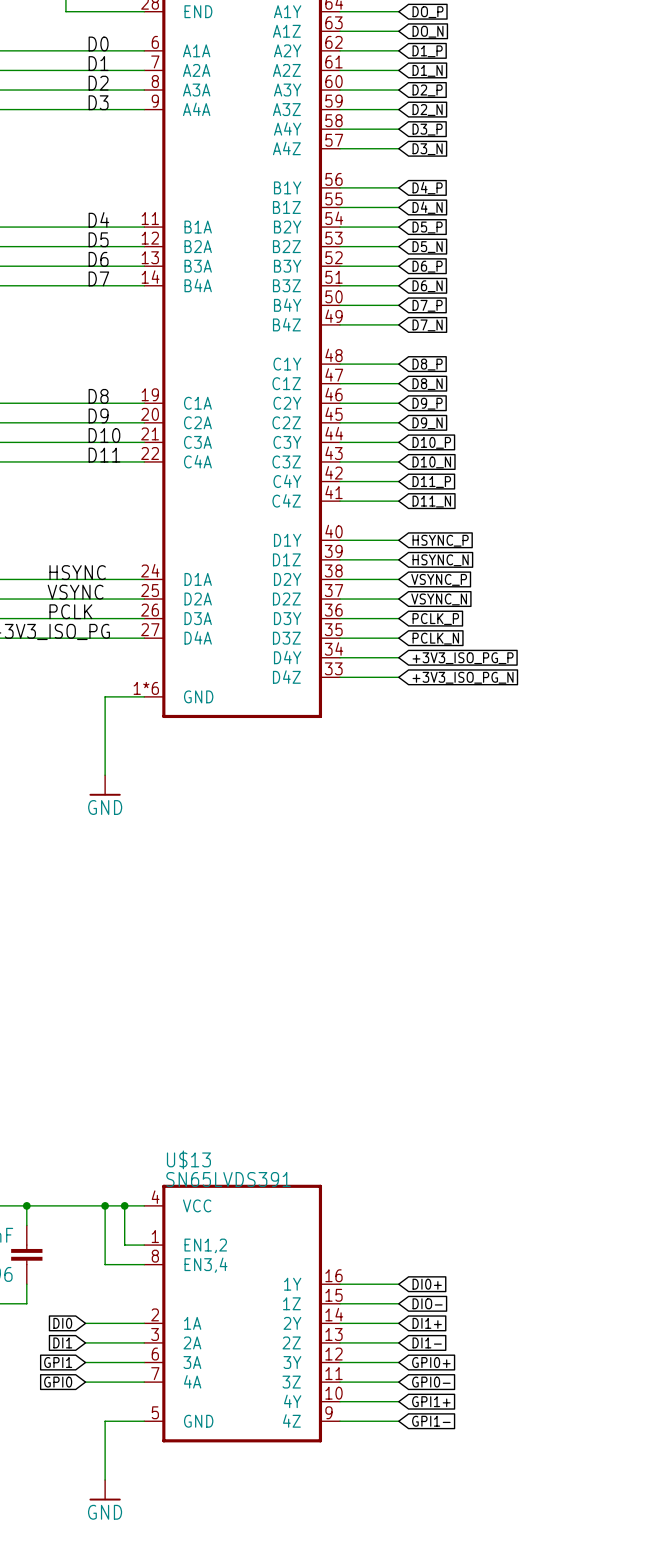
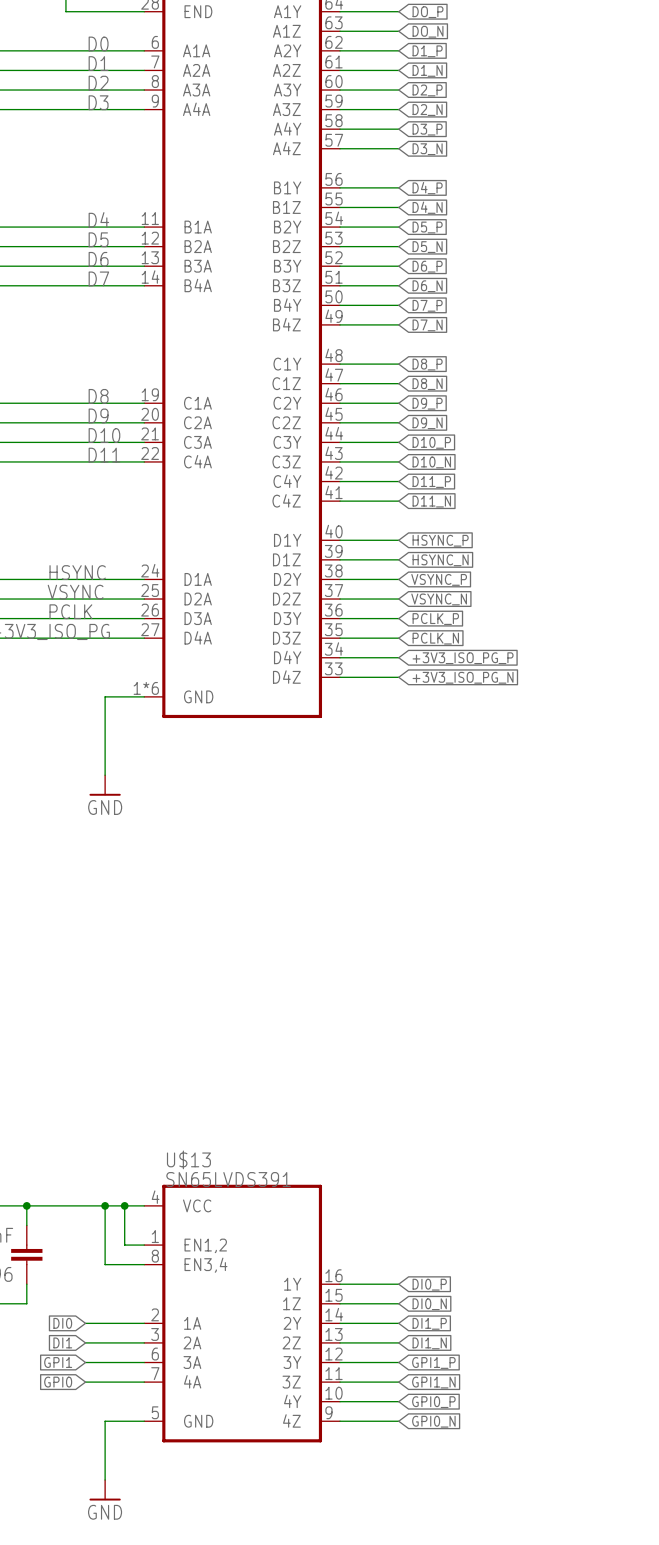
global label: DI0+ (427, 1284) -> DI0_P (429, 1284)
global label: DIO- (427, 1303) -> DI0_N (429, 1304)
global label: DI1+ (427, 1323) -> DI1_P (429, 1323)
global label: DI1- (427, 1342) -> DI1_N (429, 1343)
global label: GPI0+ (431, 1362) -> GPI1_P (433, 1362)
global label: GPI0- (431, 1382) -> GPI1_N (433, 1382)
global label: GPI1+ (431, 1401) -> GPI0_P (433, 1402)
global label: GPI1- (431, 1421) -> GPI0_N (433, 1421)

